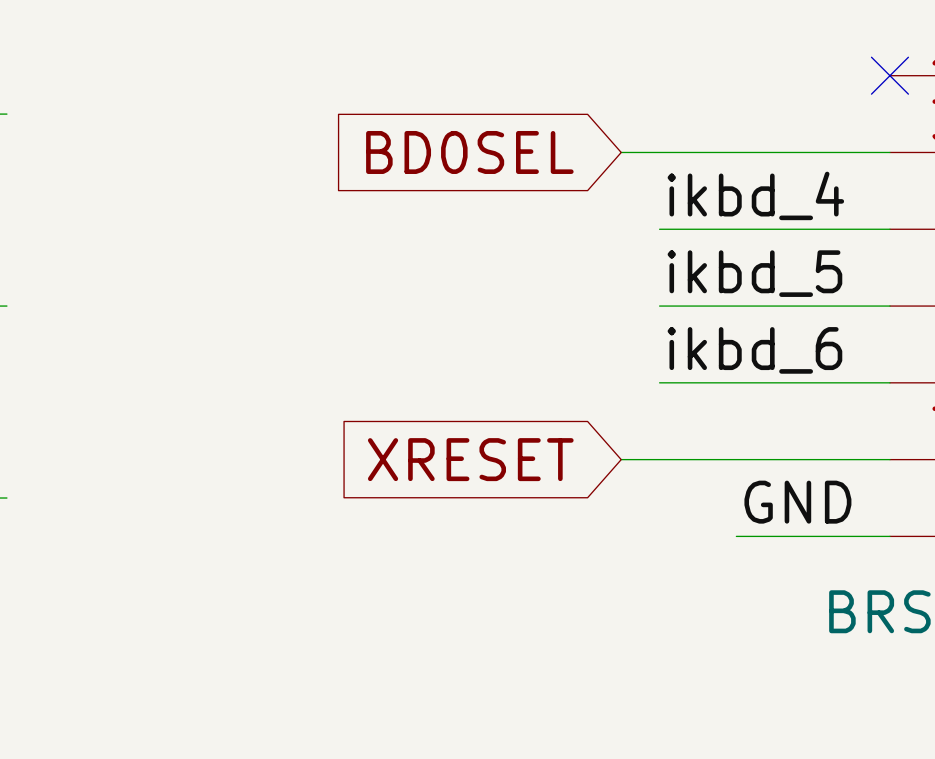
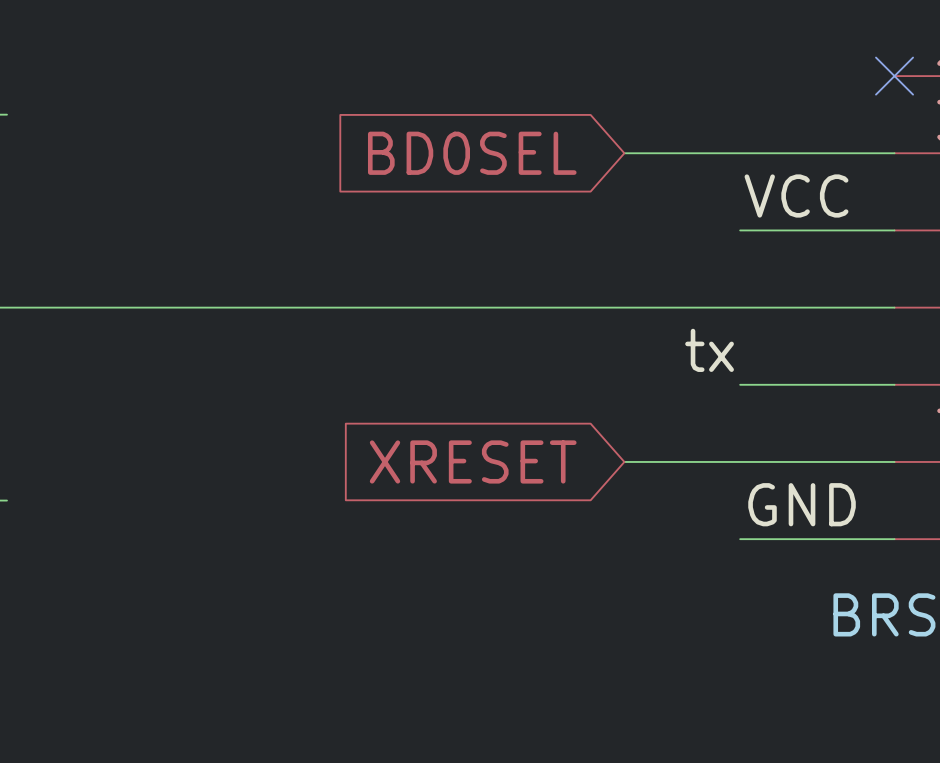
label: ikbd_4 (755, 195) -> none
label: none -> VCC (796, 196)
wire: (659, 229) (736, 229) -> none
label: ikbd_5 (754, 273) -> none
wire: none -> (6, 307) (662, 307)
label: none -> tx (709, 350)
label: ikbd_6 (754, 350) -> none
wire: (659, 382) (736, 382) -> none

